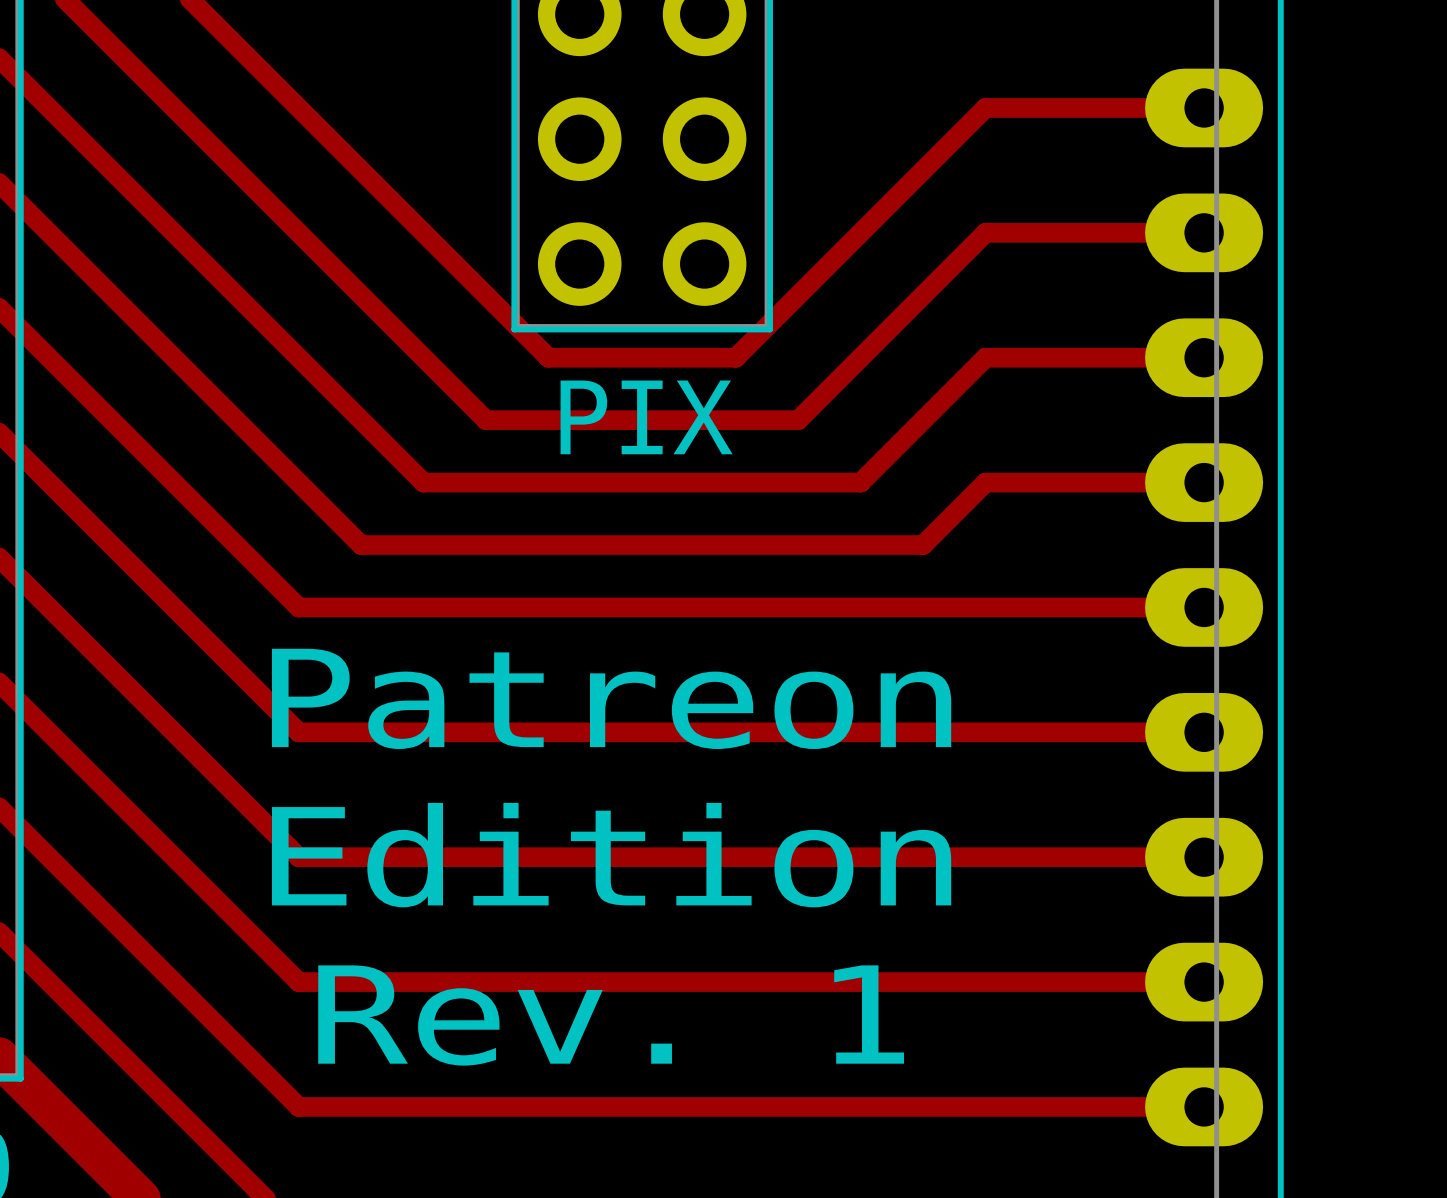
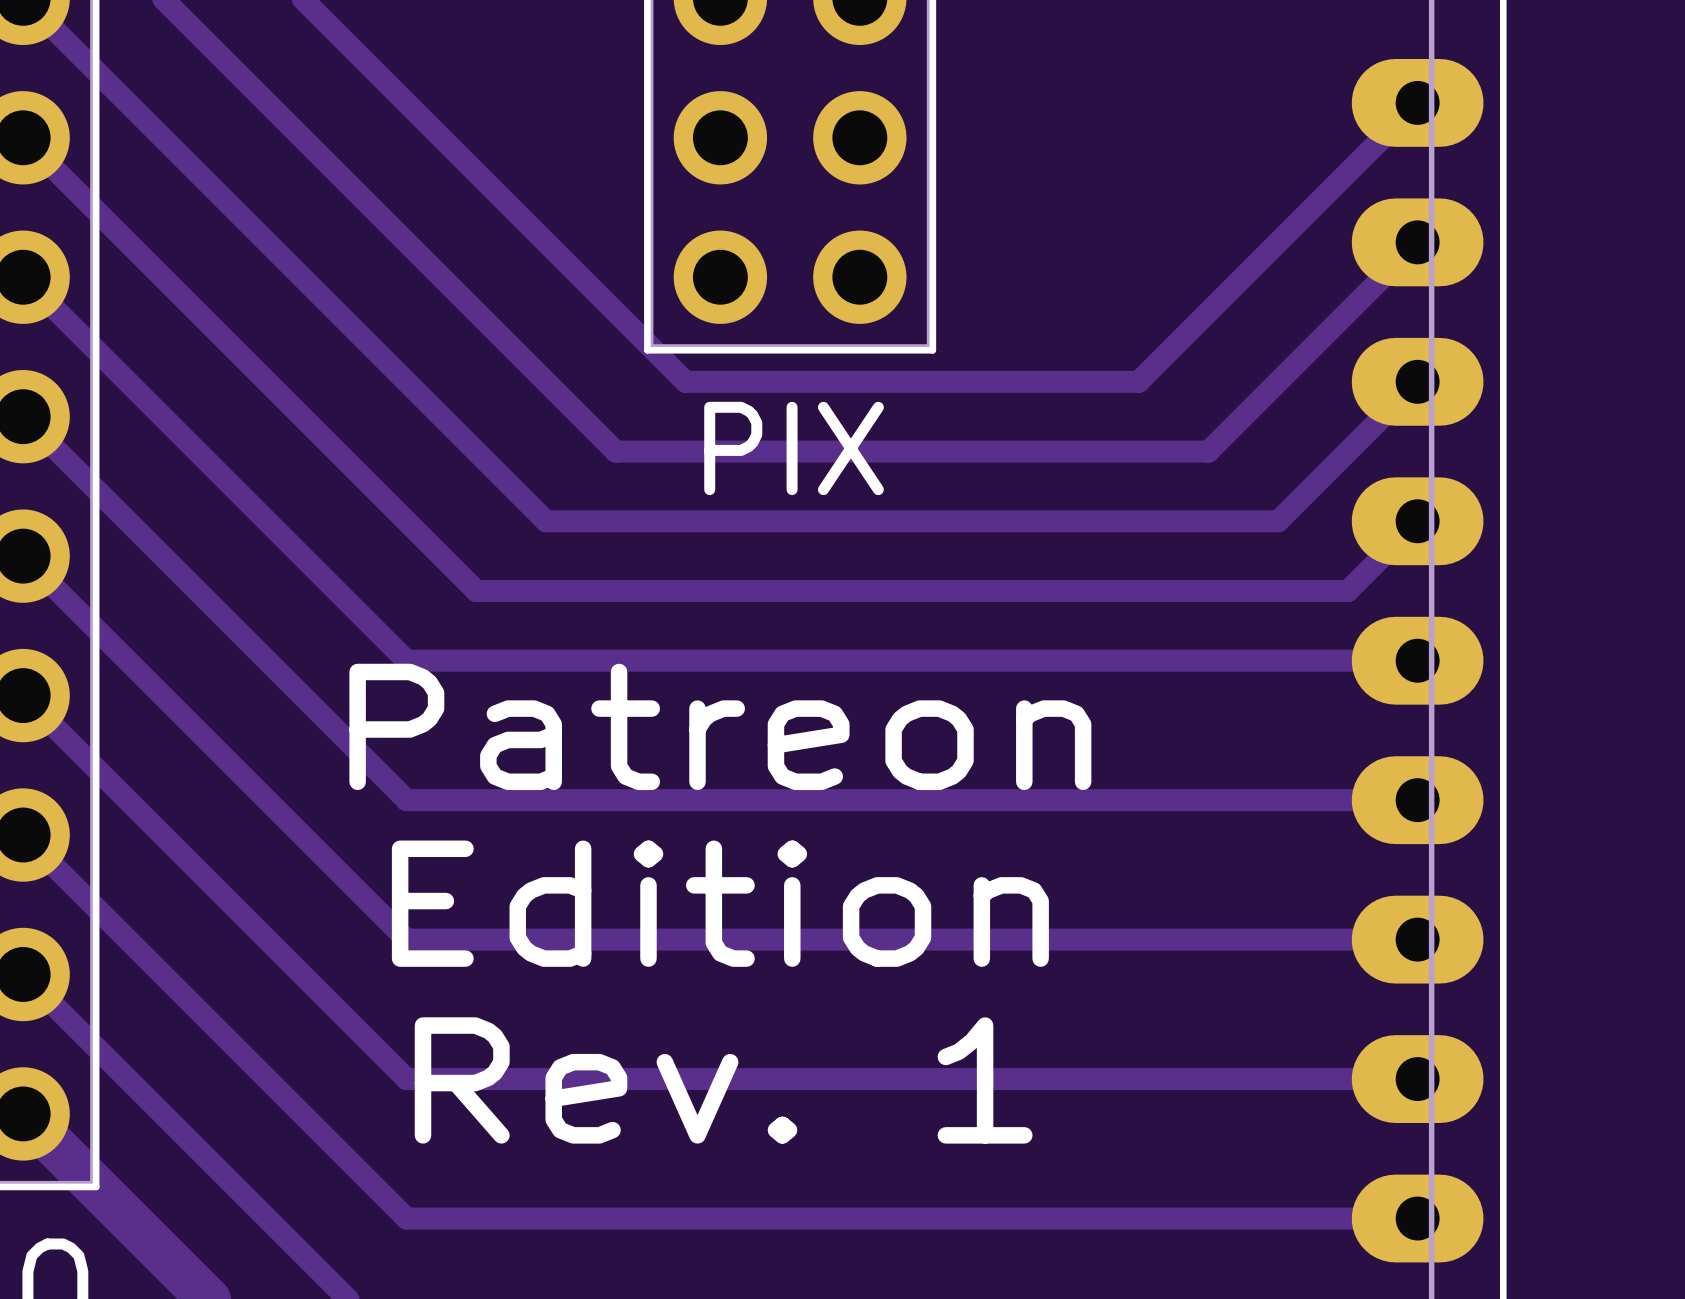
track: (1204, 107) (985, 107) (735, 357) -> (1417, 102) (1138, 381) (894, 381)
track: (1204, 232) (985, 232) (798, 420) -> (1417, 242) (1208, 451) (964, 451)
track: (1204, 357) (985, 357) (860, 482) -> none
track: (985, 482) (923, 545) -> (1173, 521) (1034, 521)
track: (1079, 482) (1204, 482) -> (1278, 521) (1417, 381)
track: none -> (1417, 521) (1347, 590) (1103, 590)
text position: Patreon (611, 698) -> Patreon (720, 726)
text position: Edition (611, 855) -> Edition (720, 903)
text position: Rev. 1 (611, 1015) -> Rev. 1 (723, 1080)

